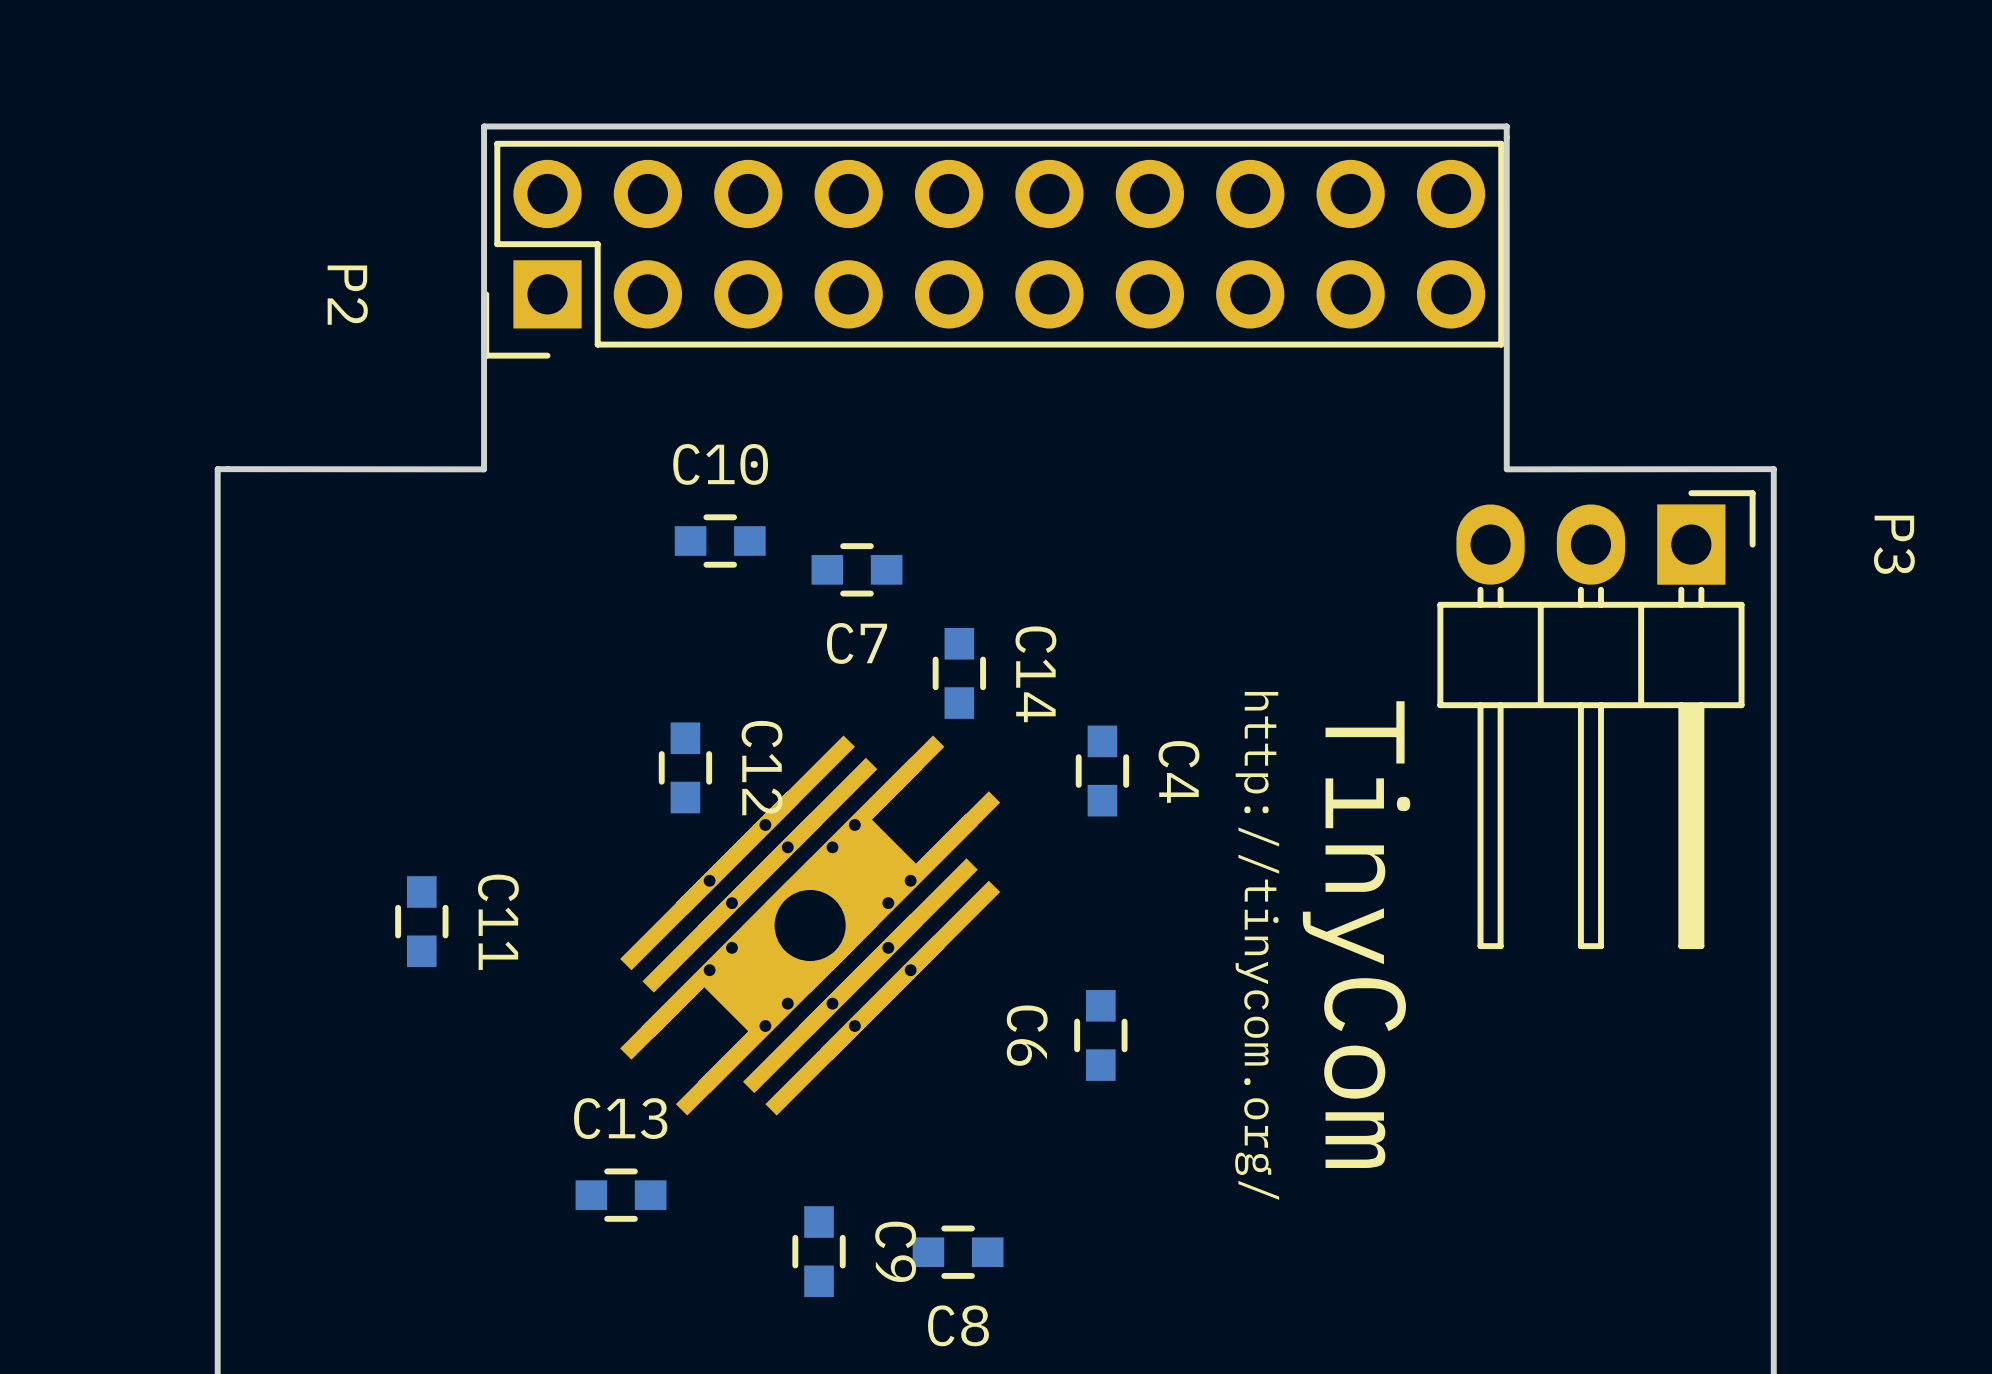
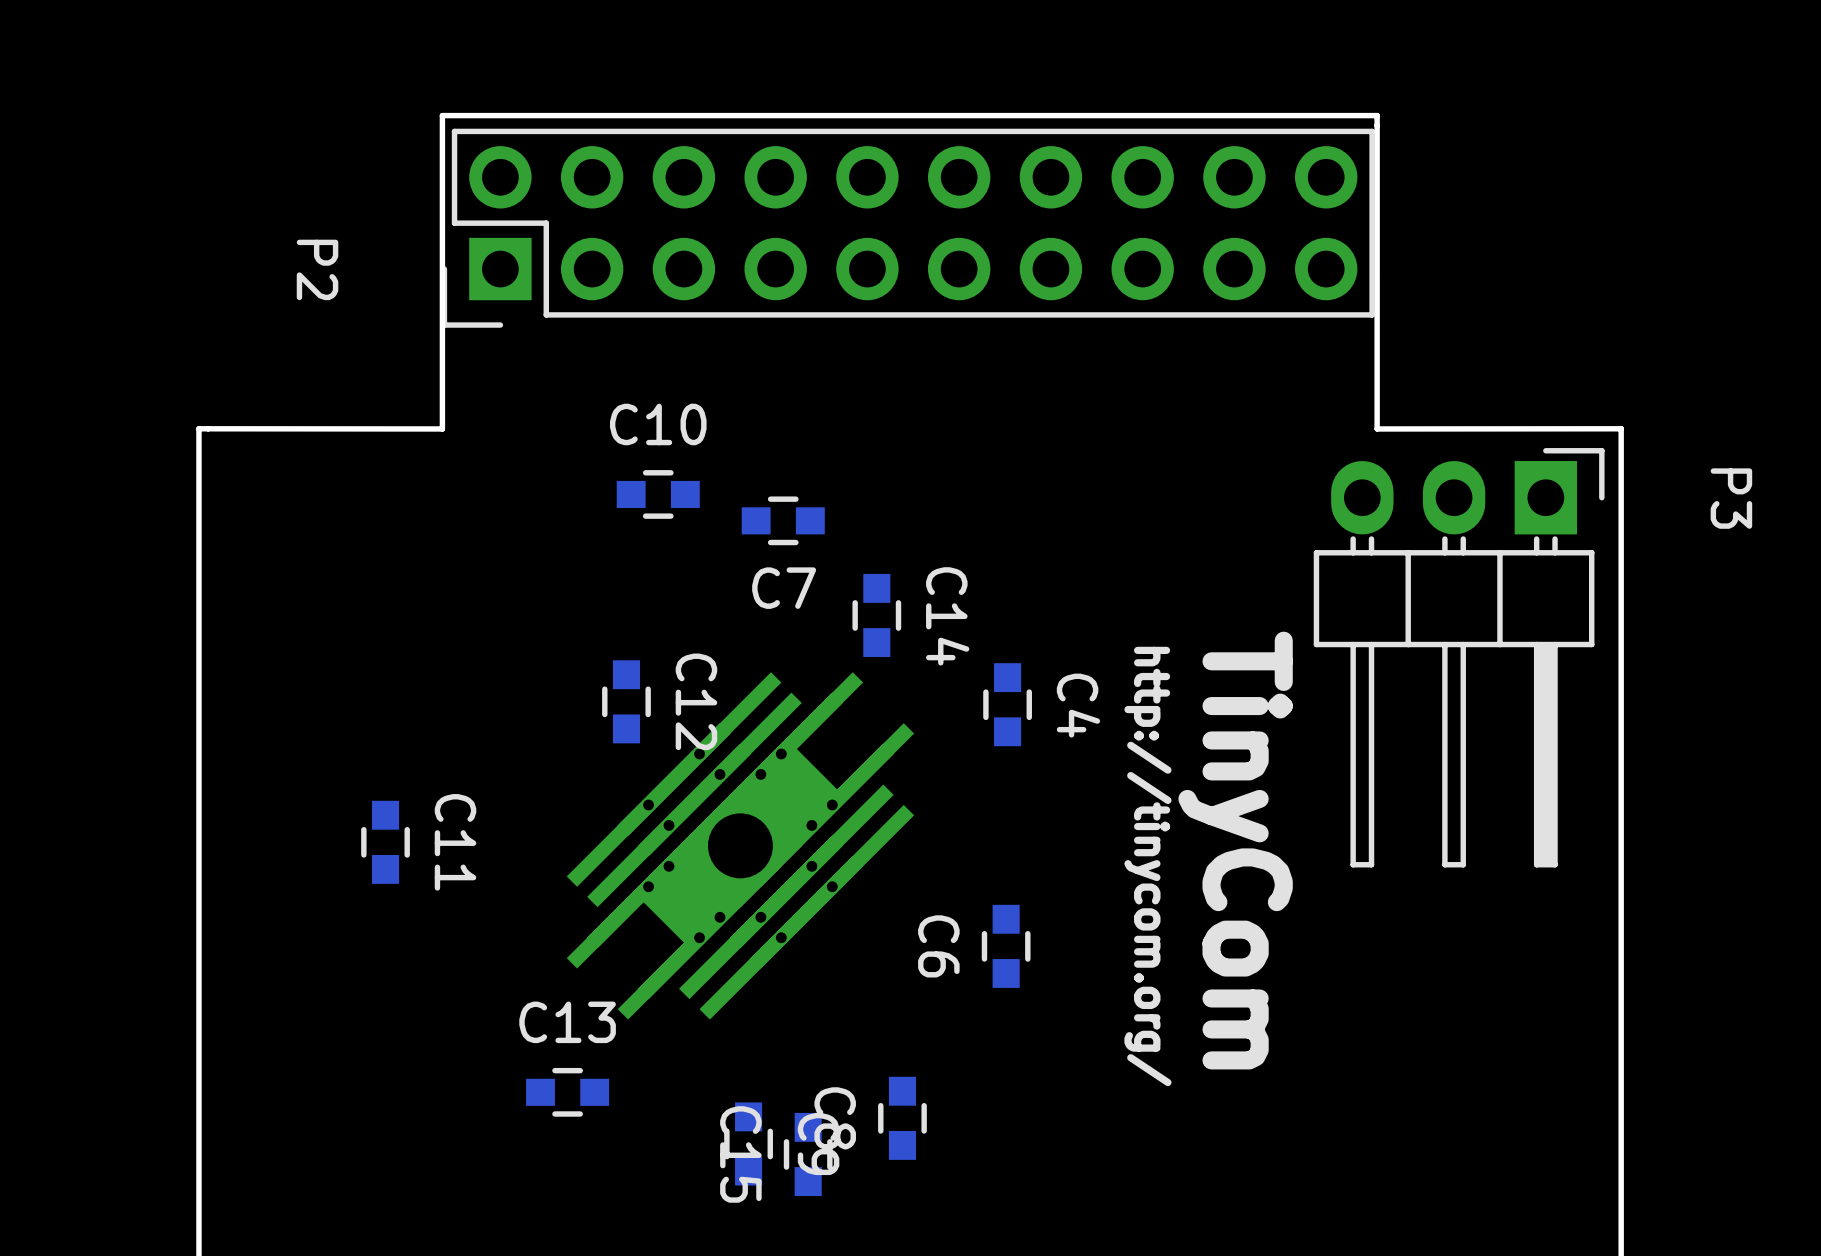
C8 rotation: 0° (958, 1252) -> 90° clockwise (902, 1118)
C15: none -> (808, 1154)

